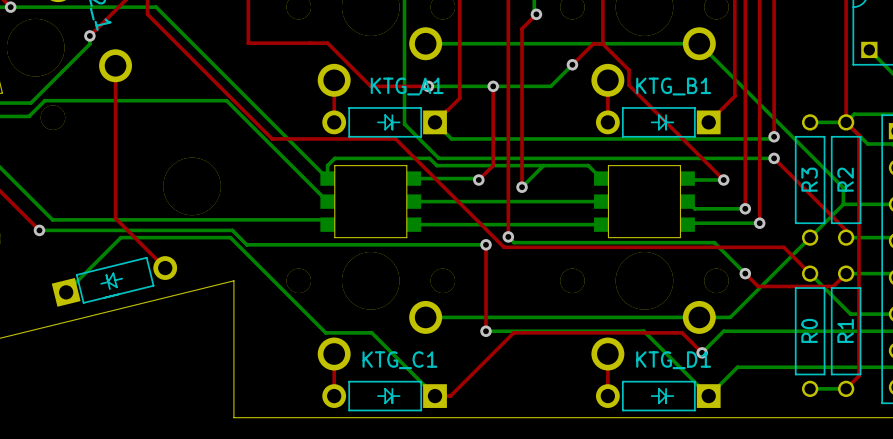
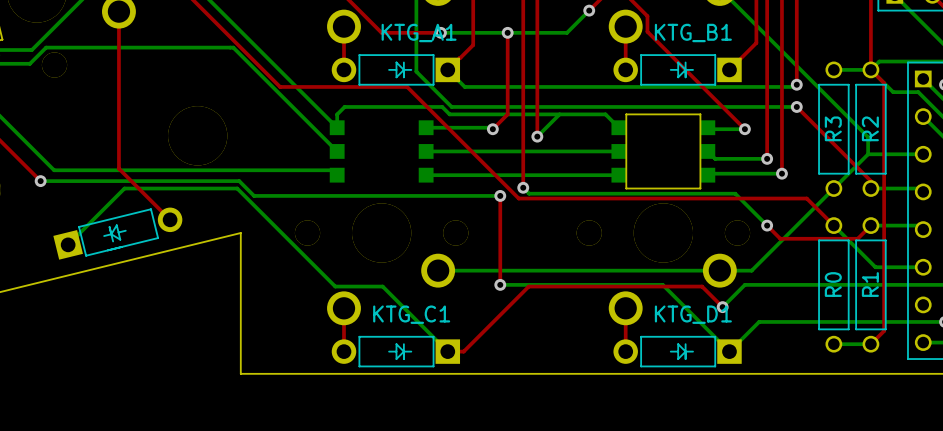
board edge: (334, 165) (406, 165) (406, 237) (334, 237) (334, 165) -> none

